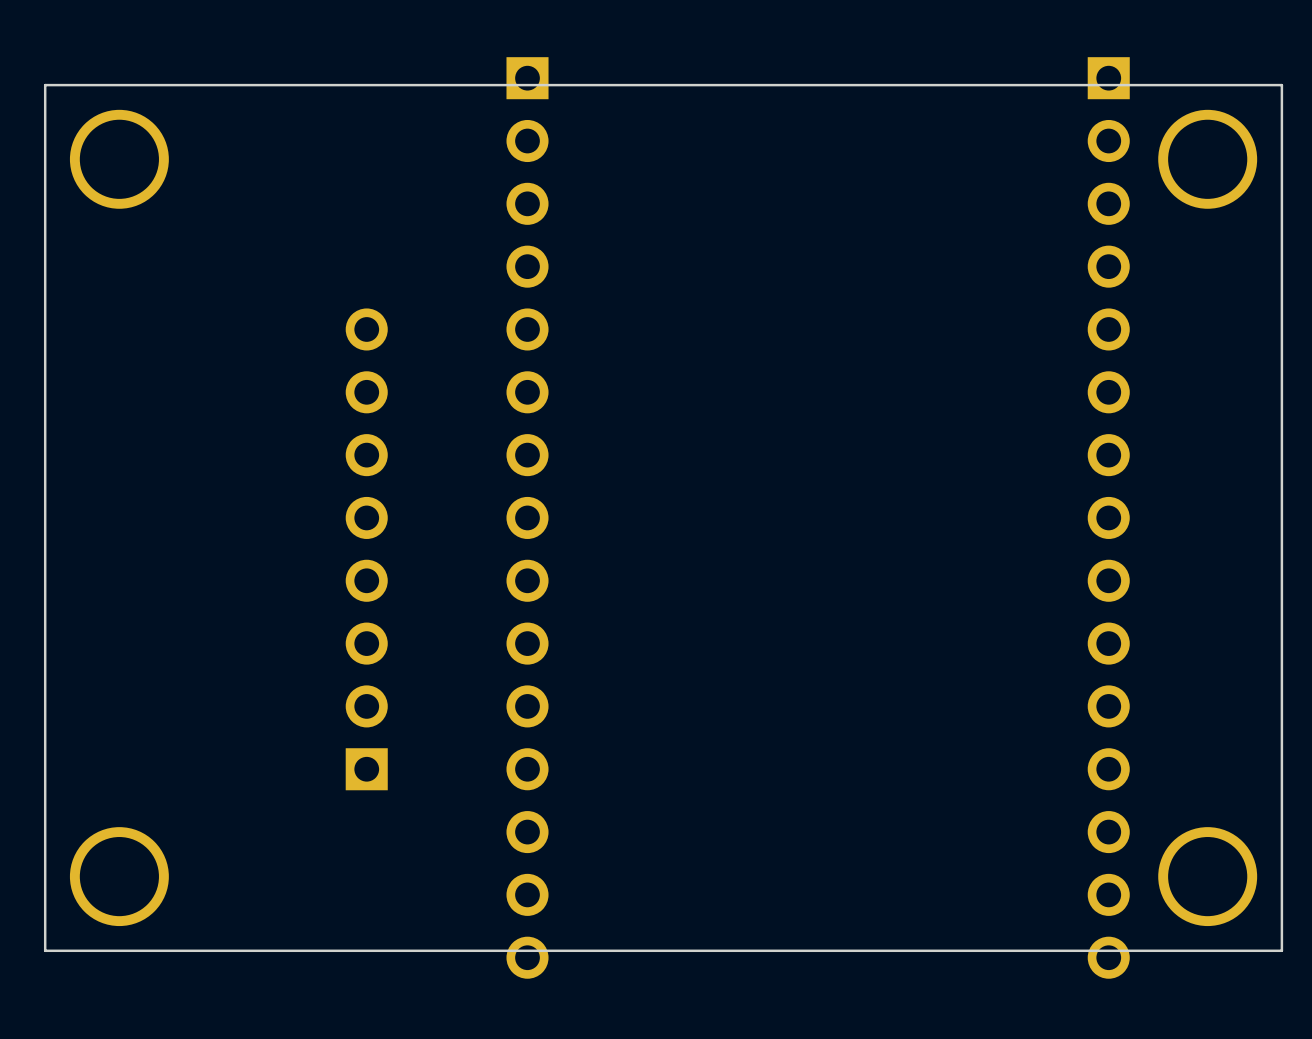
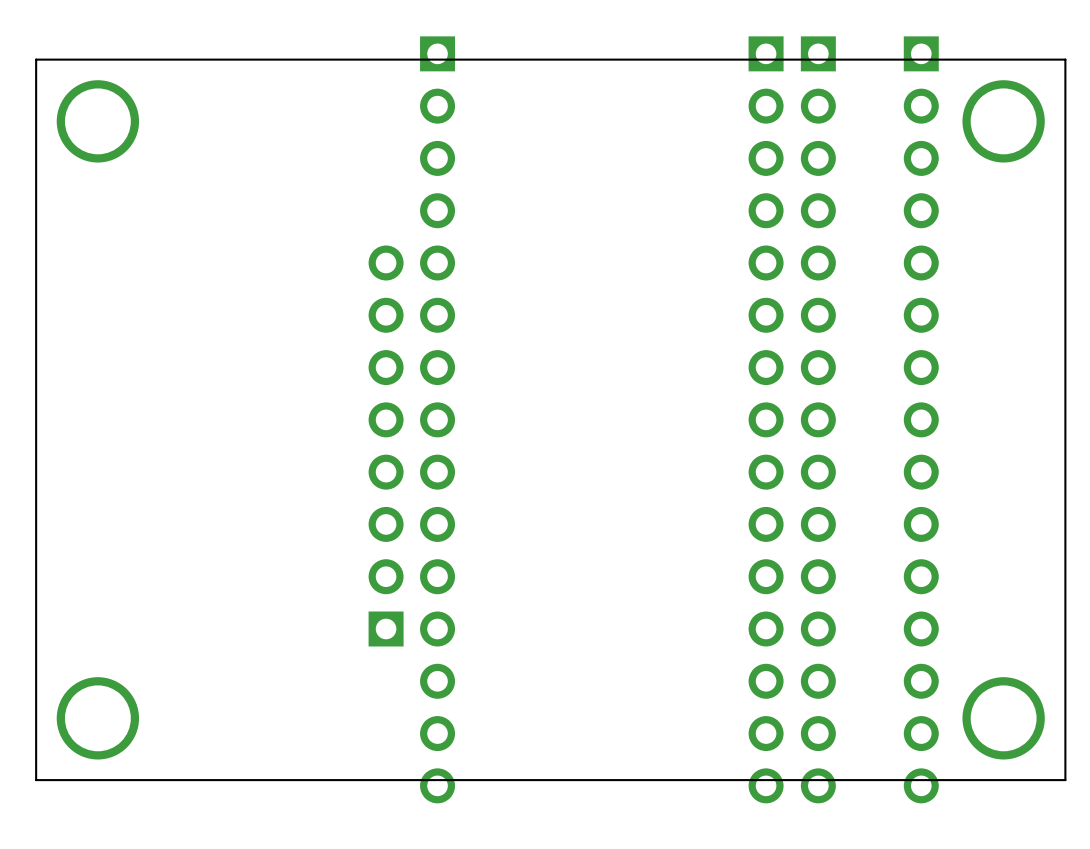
part: none -> (792, 419)
part position: (366, 549) -> (386, 446)

